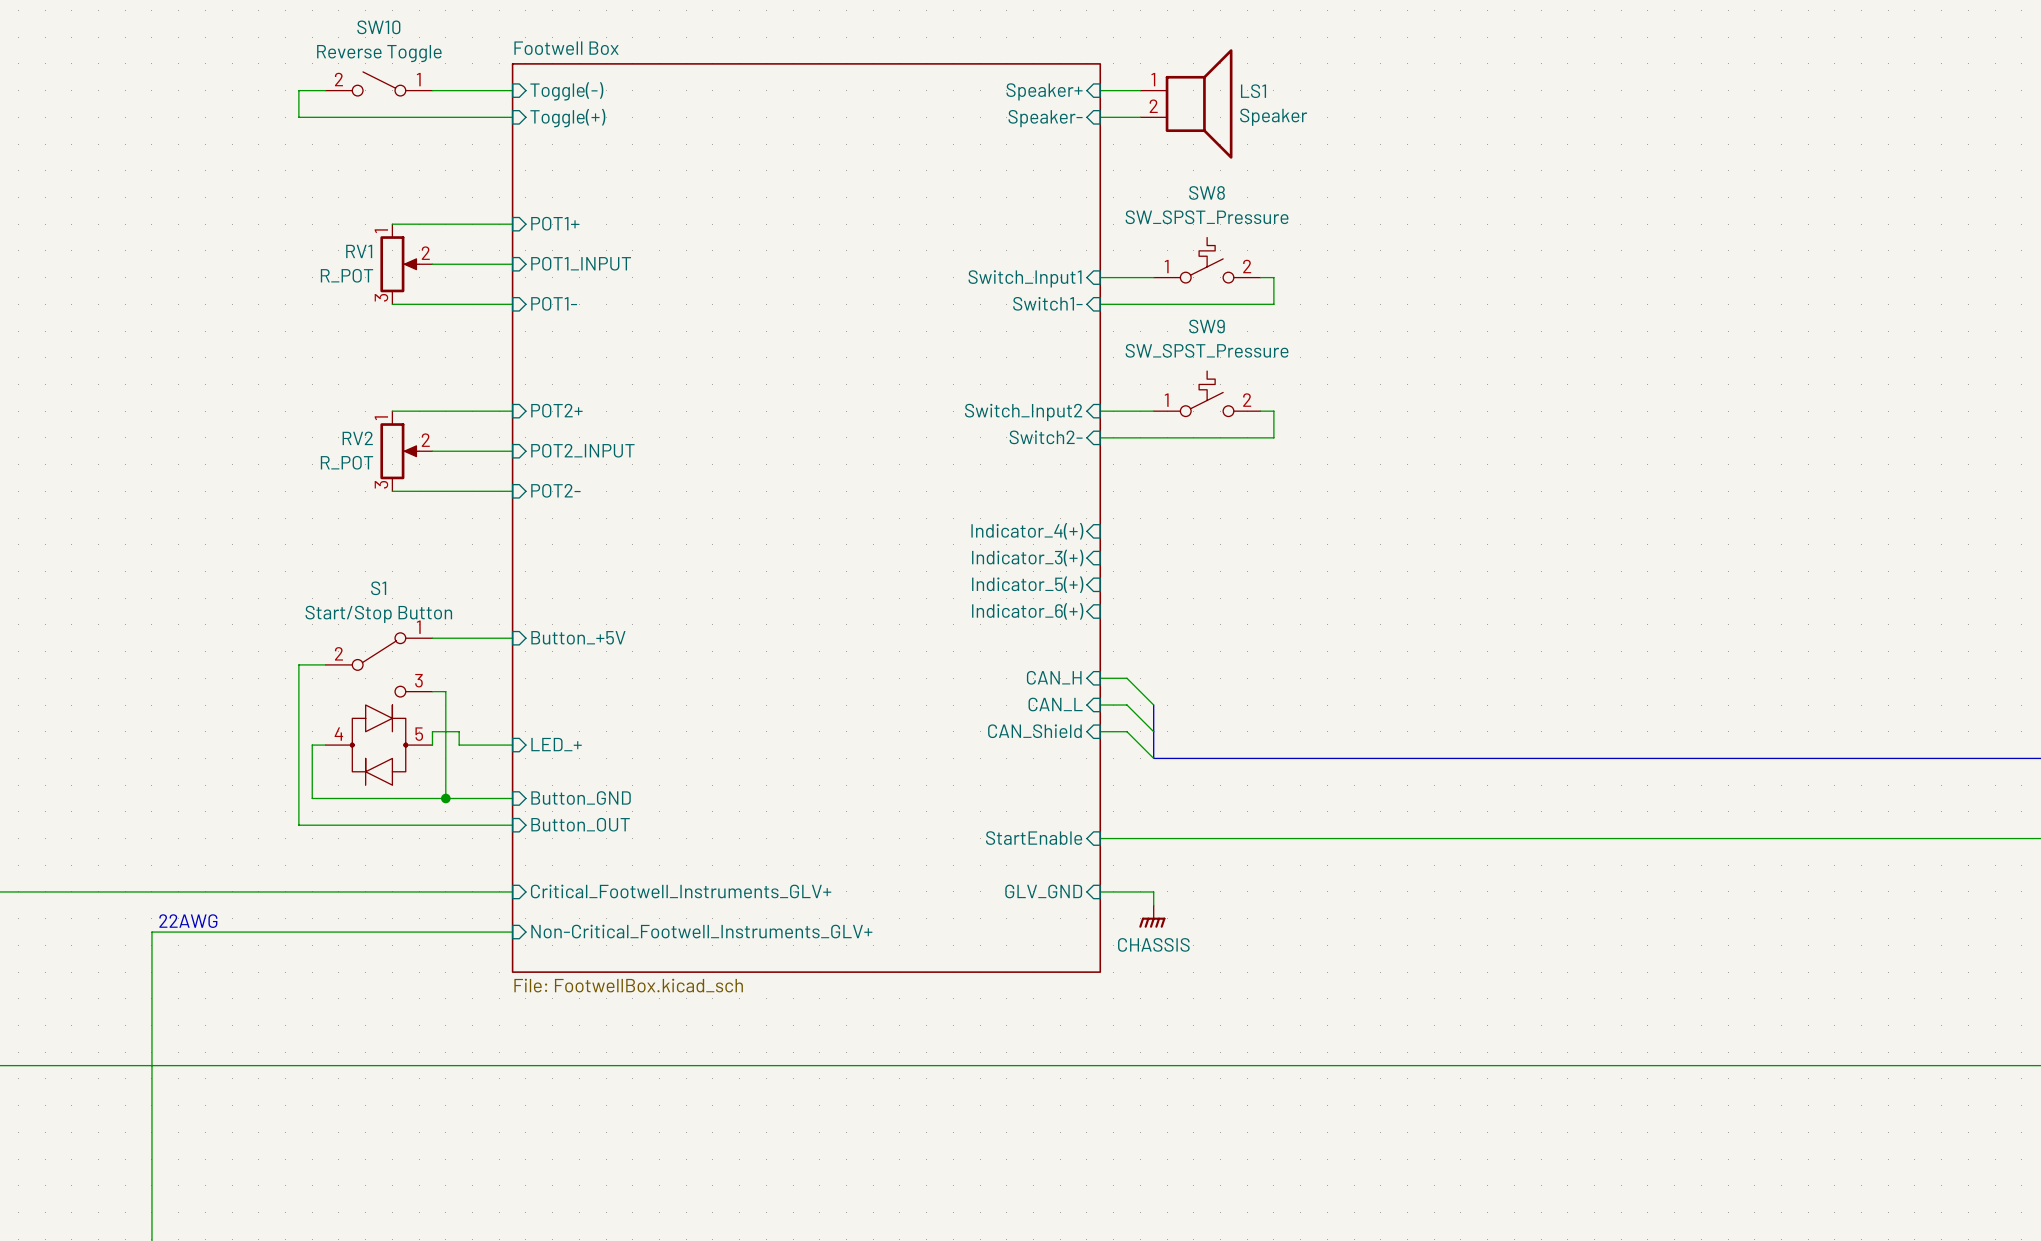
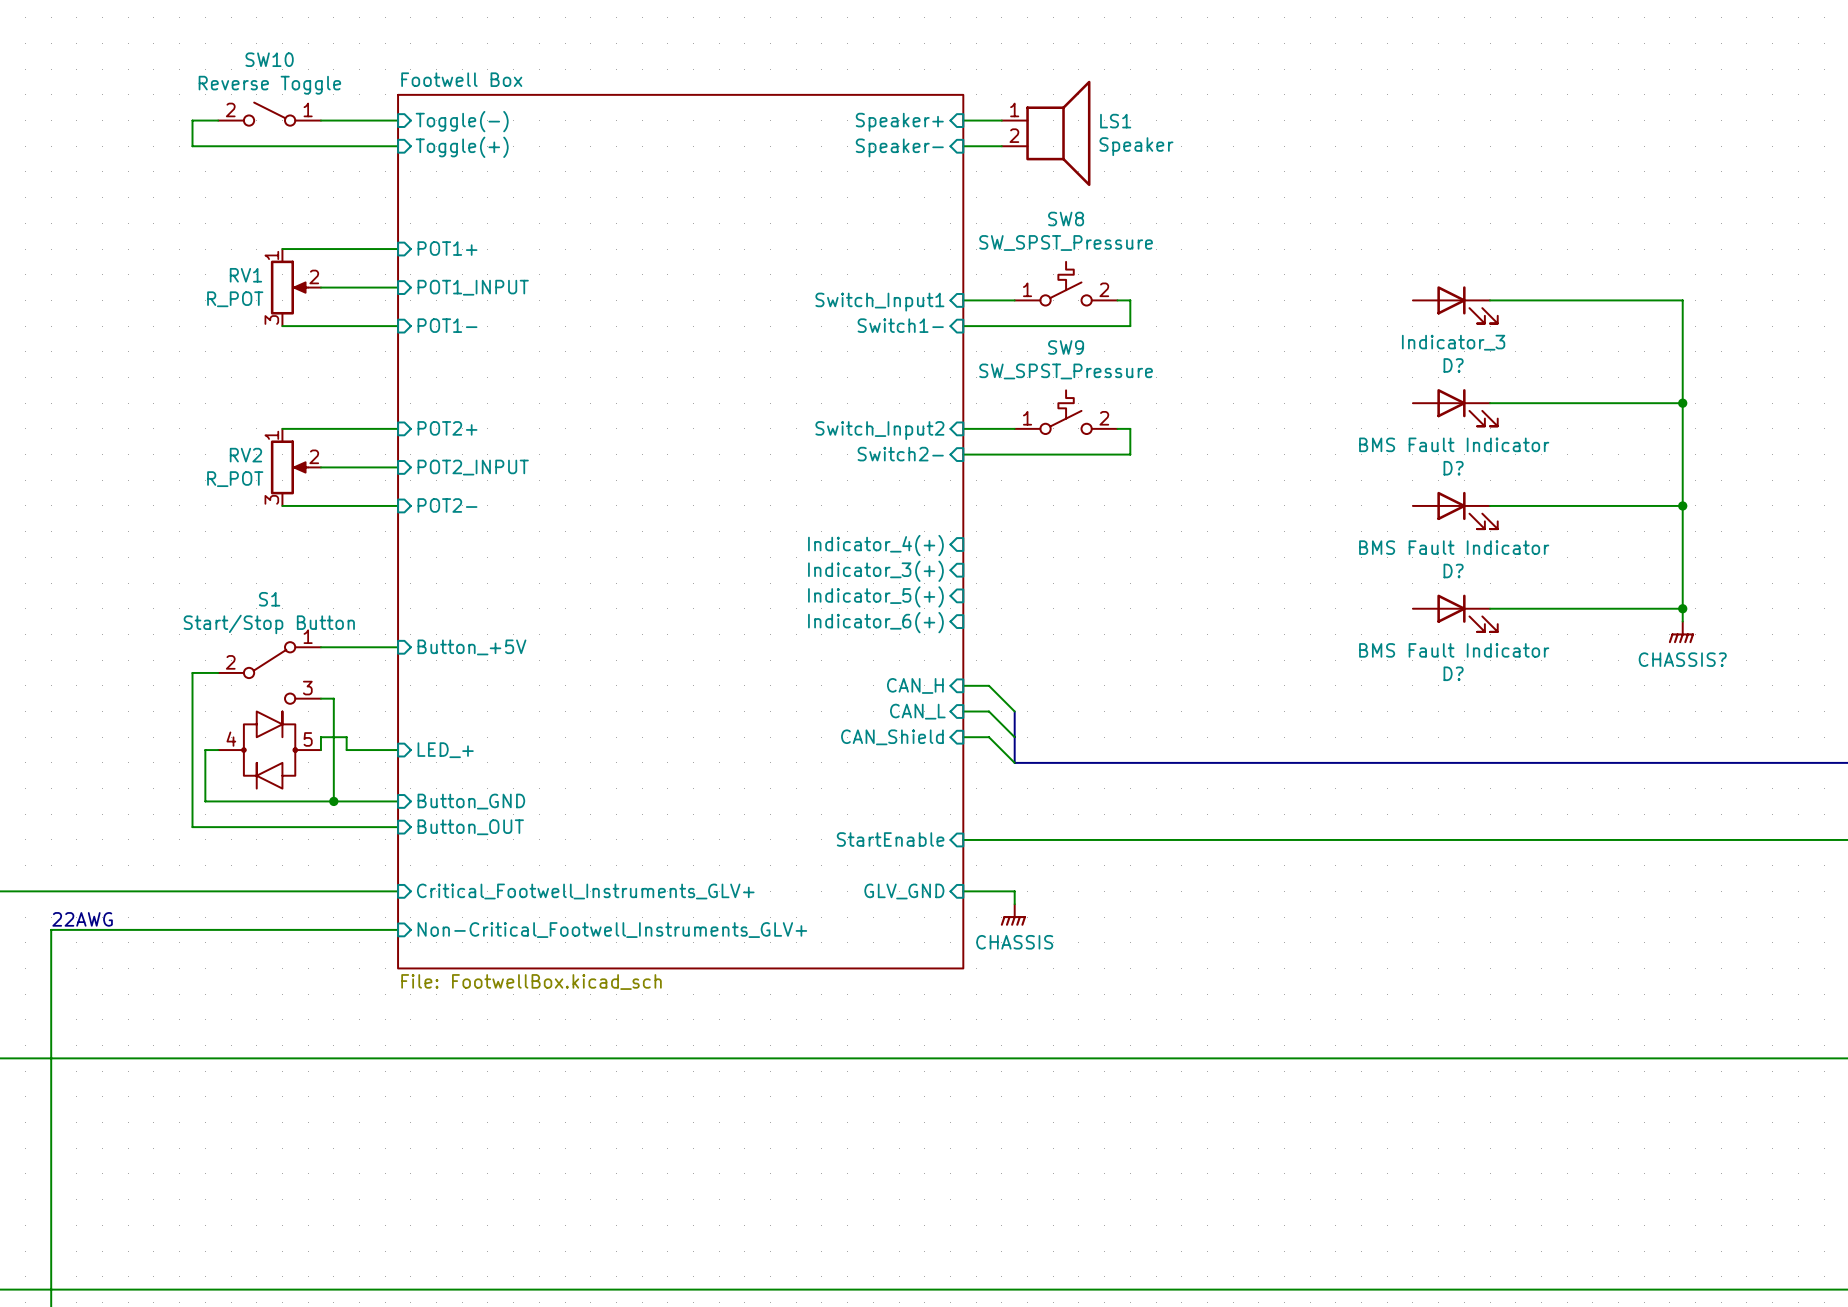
wire: none -> (1490, 300) (1682, 300) (1682, 621)
D?: none -> Indicator_3 (1455, 304)
wire: none -> (1490, 403) (1682, 403)
junction: none -> (1682, 403)
D?: none -> BMS Fault Indicator (1455, 407)
wire: none -> (1490, 505) (1682, 505)
junction: none -> (1682, 505)
D?: none -> BMS Fault Indicator (1455, 510)
wire: none -> (1490, 608) (1682, 608)
junction: none -> (1682, 608)
D?: none -> BMS Fault Indicator (1455, 613)
CHASSIS?: none -> (1681, 632)

